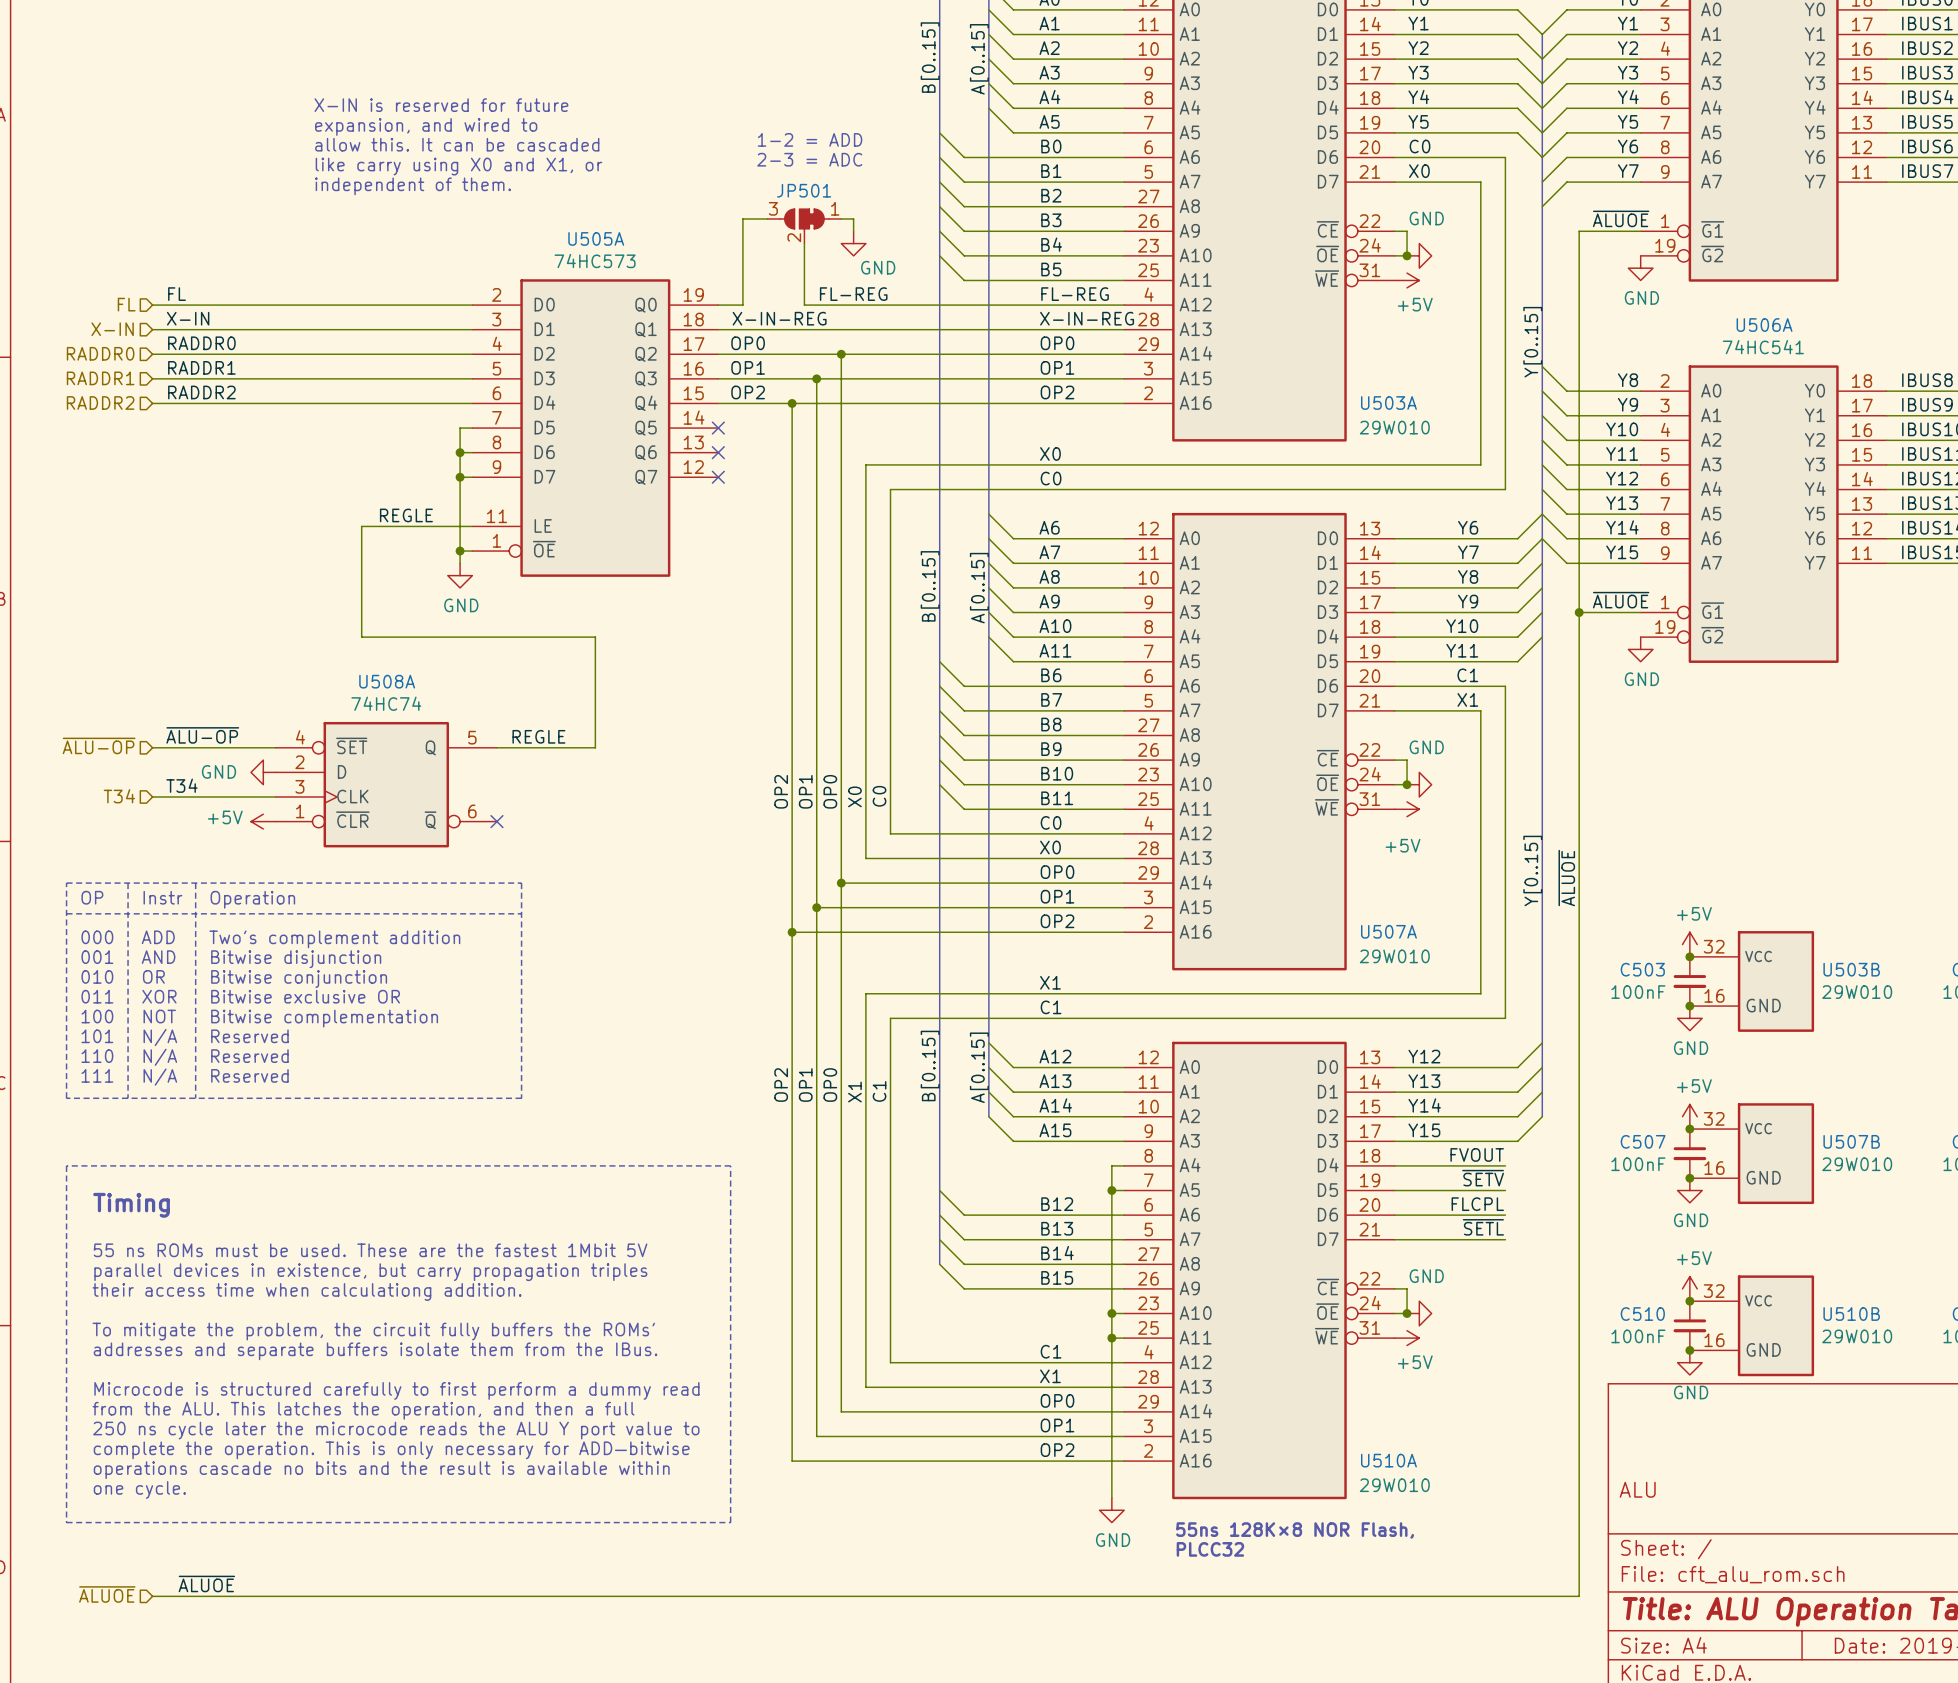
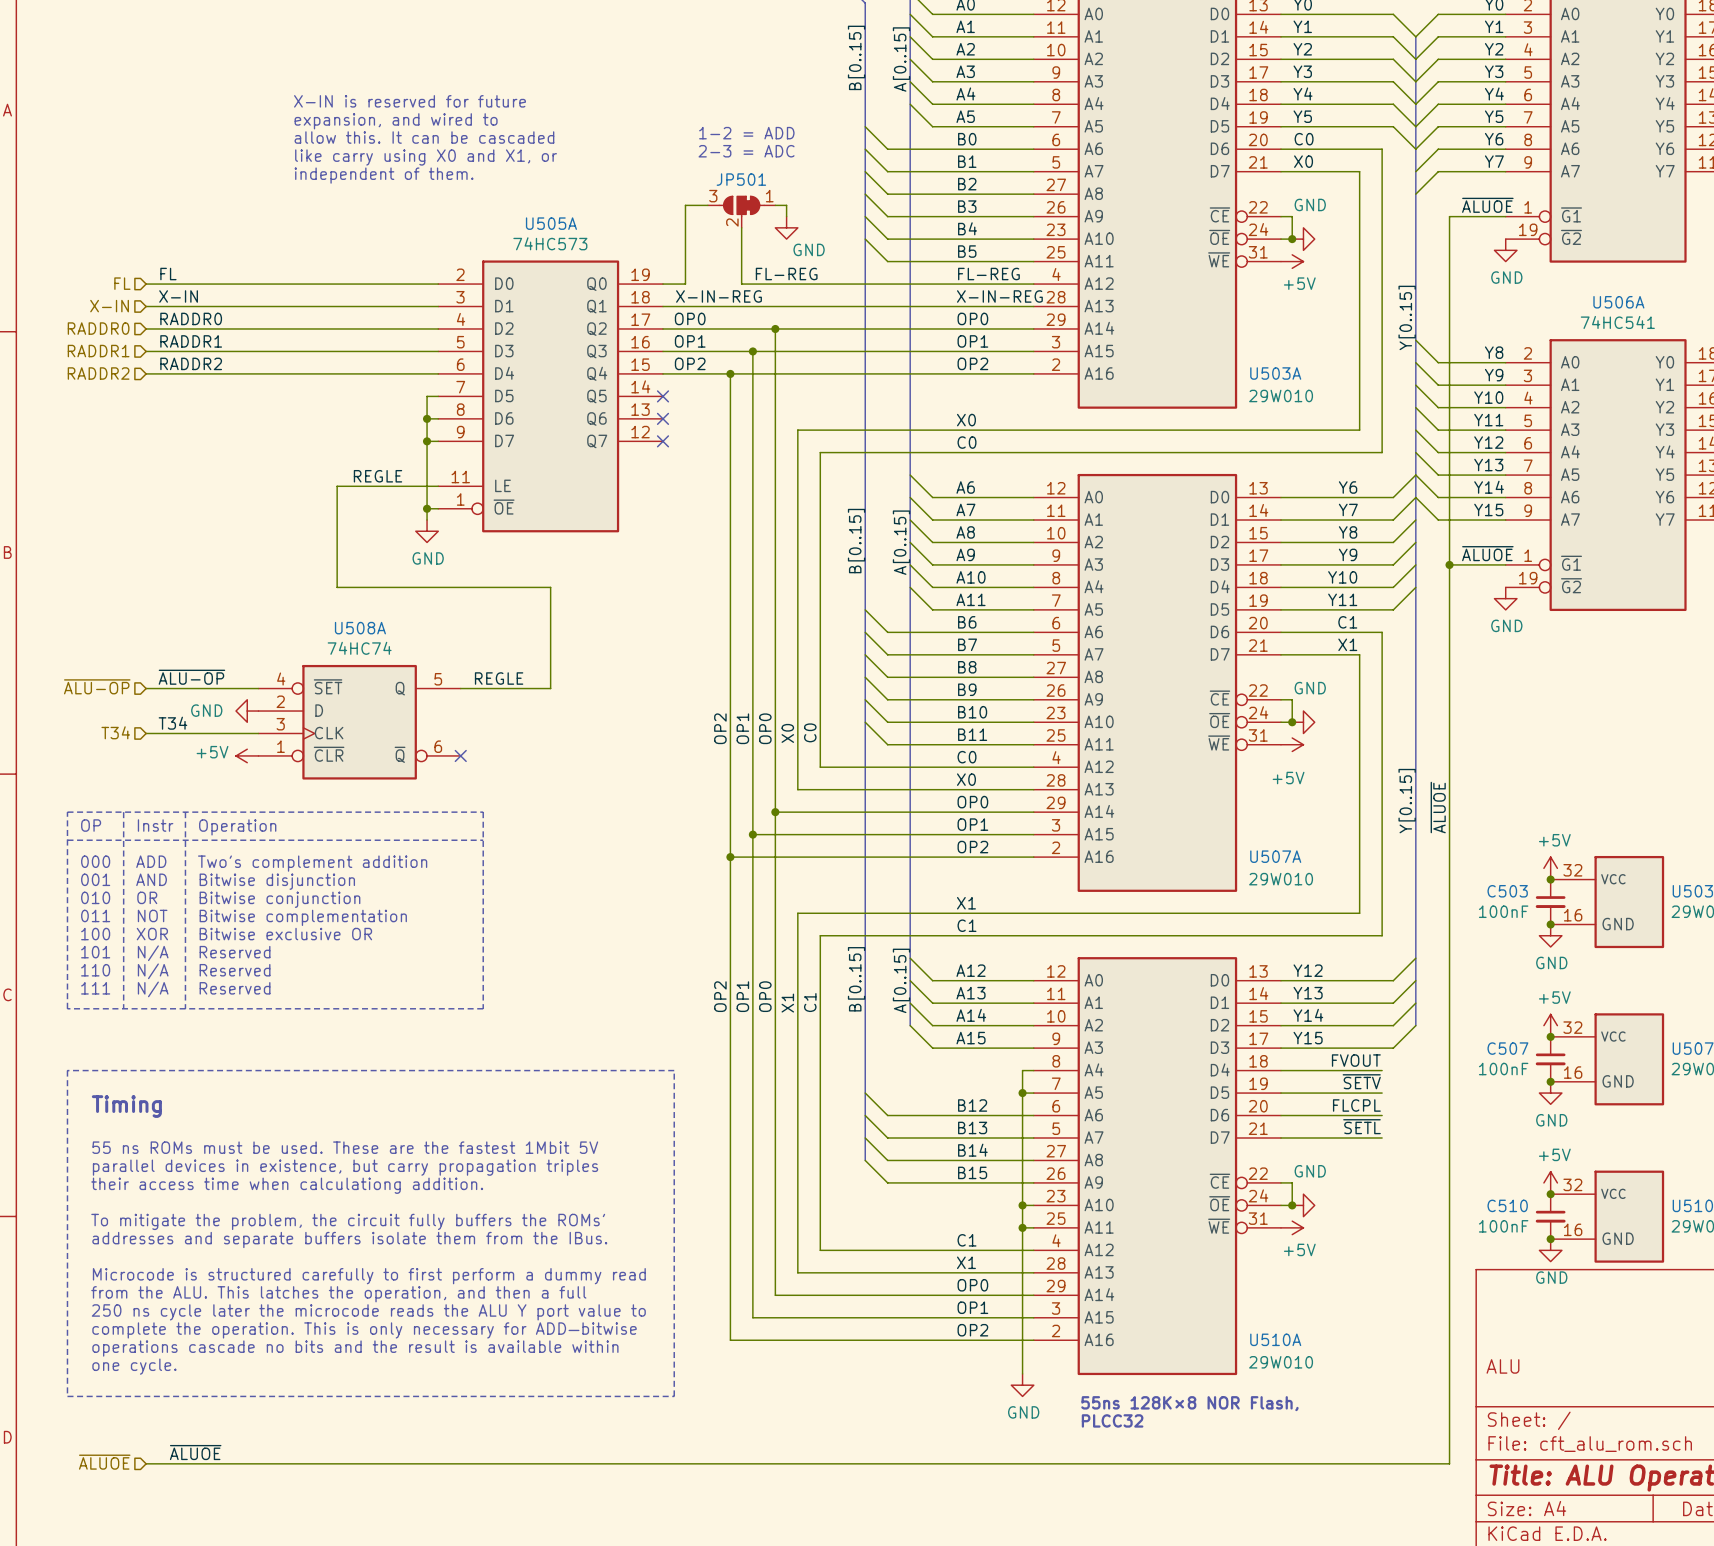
text: XOR (159, 996) -> NOT (152, 915)
text: Bitwise exclusive OR (305, 996) -> Bitwise complementation (303, 917)
text: NOT (159, 1016) -> XOR (152, 934)
text: Bitwise complementation (324, 1018) -> Bitwise exclusive OR (285, 934)

